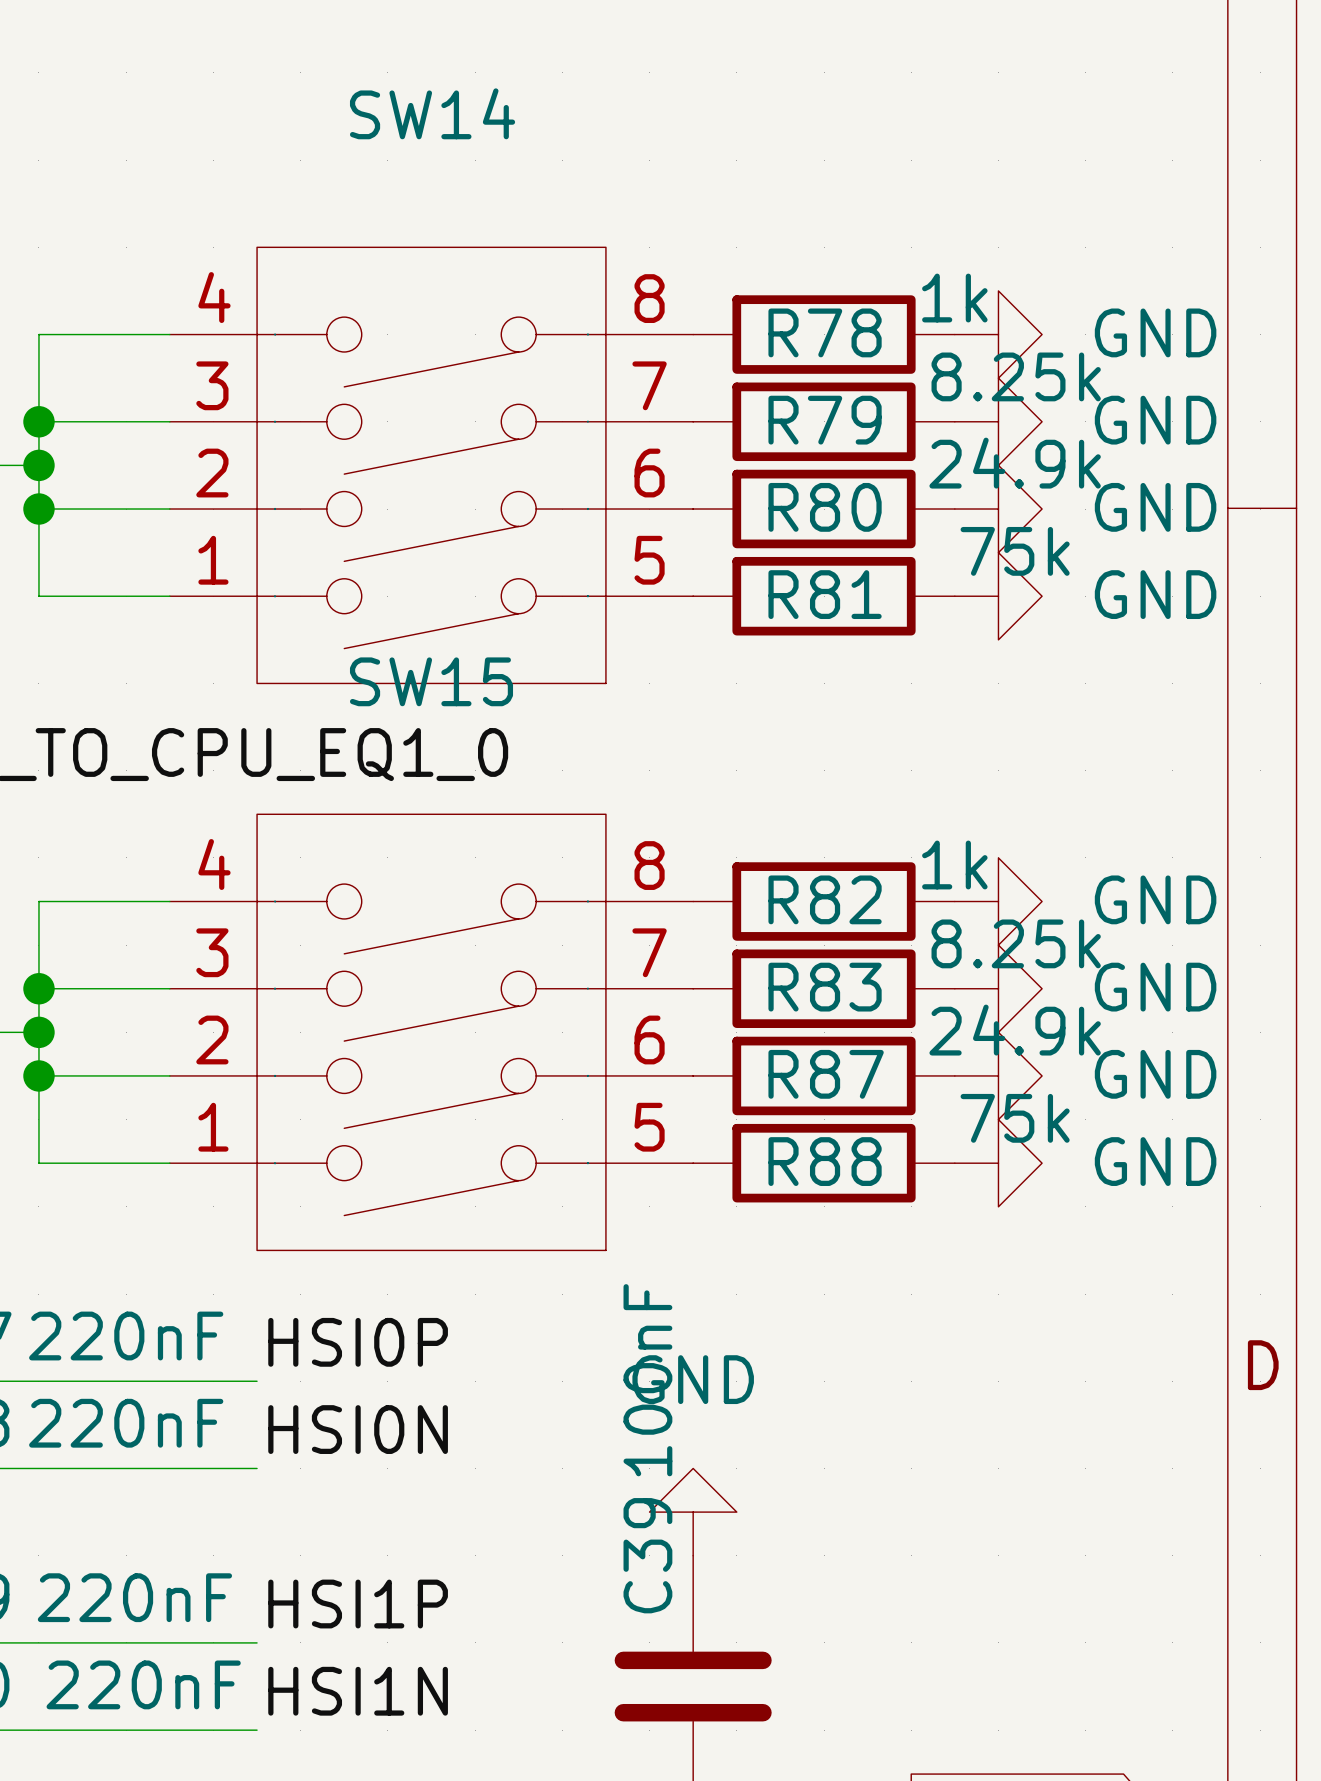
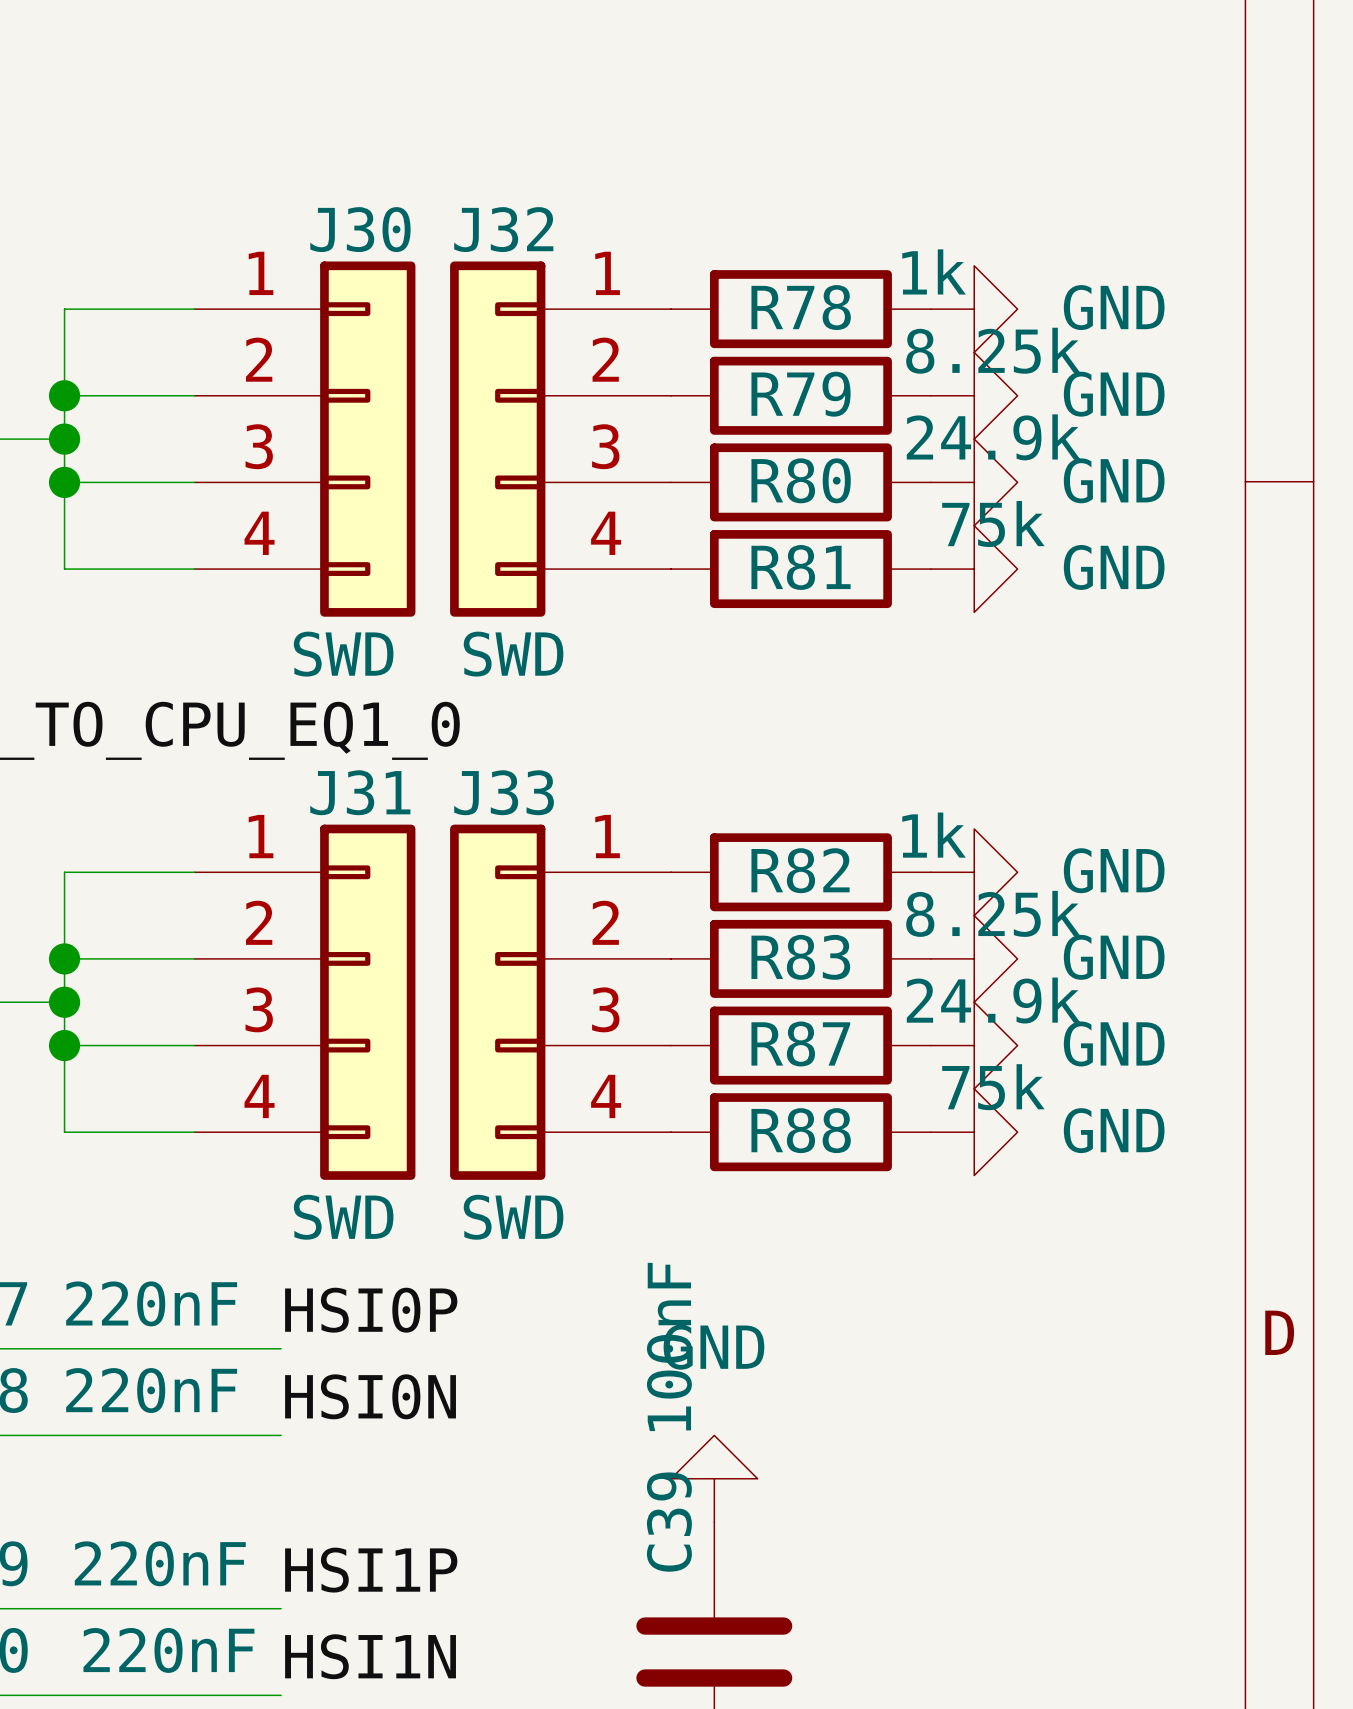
R78 position: (824, 334) -> (800, 309)
power symbol position: GND (998, 334) -> GND (974, 309)
R79 position: (824, 421) -> (800, 395)
power symbol position: GND (998, 421) -> GND (974, 395)
J30: none -> SWD (304, 439)
SW14: (431, 465) -> none
J32: none -> SWD (560, 439)
R80 position: (824, 509) -> (800, 482)
power symbol position: GND (998, 509) -> GND (974, 482)
R81 position: (824, 596) -> (800, 569)
power symbol position: GND (998, 596) -> GND (974, 569)
R82 position: (824, 901) -> (800, 872)
power symbol position: GND (998, 901) -> GND (974, 872)
R83 position: (824, 988) -> (800, 958)
power symbol position: GND (998, 988) -> GND (974, 958)
J31: none -> SWD (304, 1002)
SW15: (431, 1032) -> none
J33: none -> SWD (560, 1002)
R87 position: (824, 1075) -> (800, 1045)
power symbol position: GND (998, 1075) -> GND (974, 1045)
R88 position: (824, 1163) -> (800, 1132)
power symbol position: GND (998, 1163) -> GND (974, 1132)

